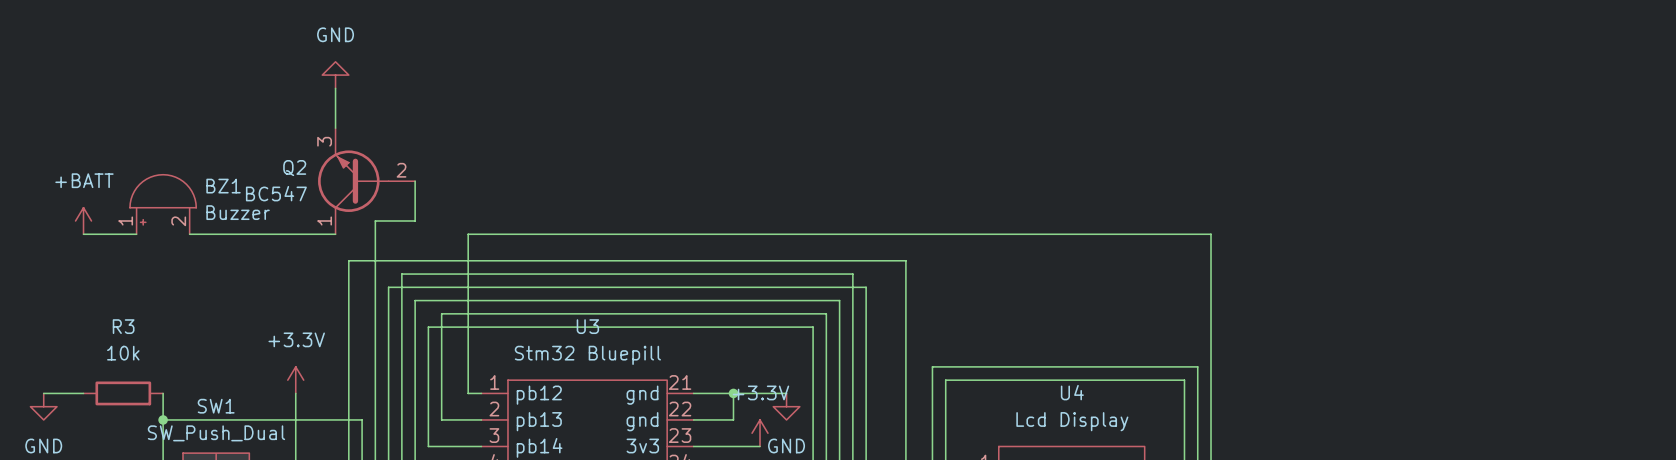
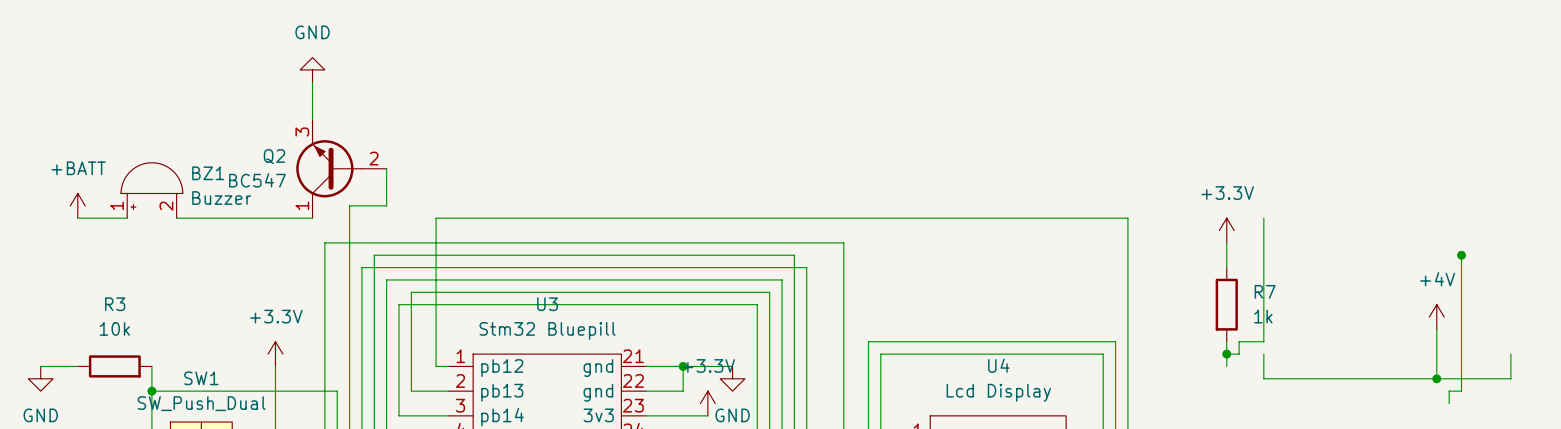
wire: none -> (1263, 218) (1263, 341) (1239, 341) (1239, 354) (1226, 354)
power symbol: none -> +3.3V (1226, 230)
wire: none -> (1226, 242) (1226, 267)
wire: none -> (1461, 255) (1461, 391) (1449, 391) (1449, 403)
junction: none -> (1461, 255)
R7: none -> 1k (1226, 304)
power symbol: none -> +4V (1436, 317)
wire: none -> (1436, 329) (1436, 378)
wire: none -> (1226, 341) (1226, 366)
junction: none -> (1226, 354)
wire: none -> (1263, 354) (1263, 378) (1510, 378) (1510, 354)
junction: none -> (1436, 378)

